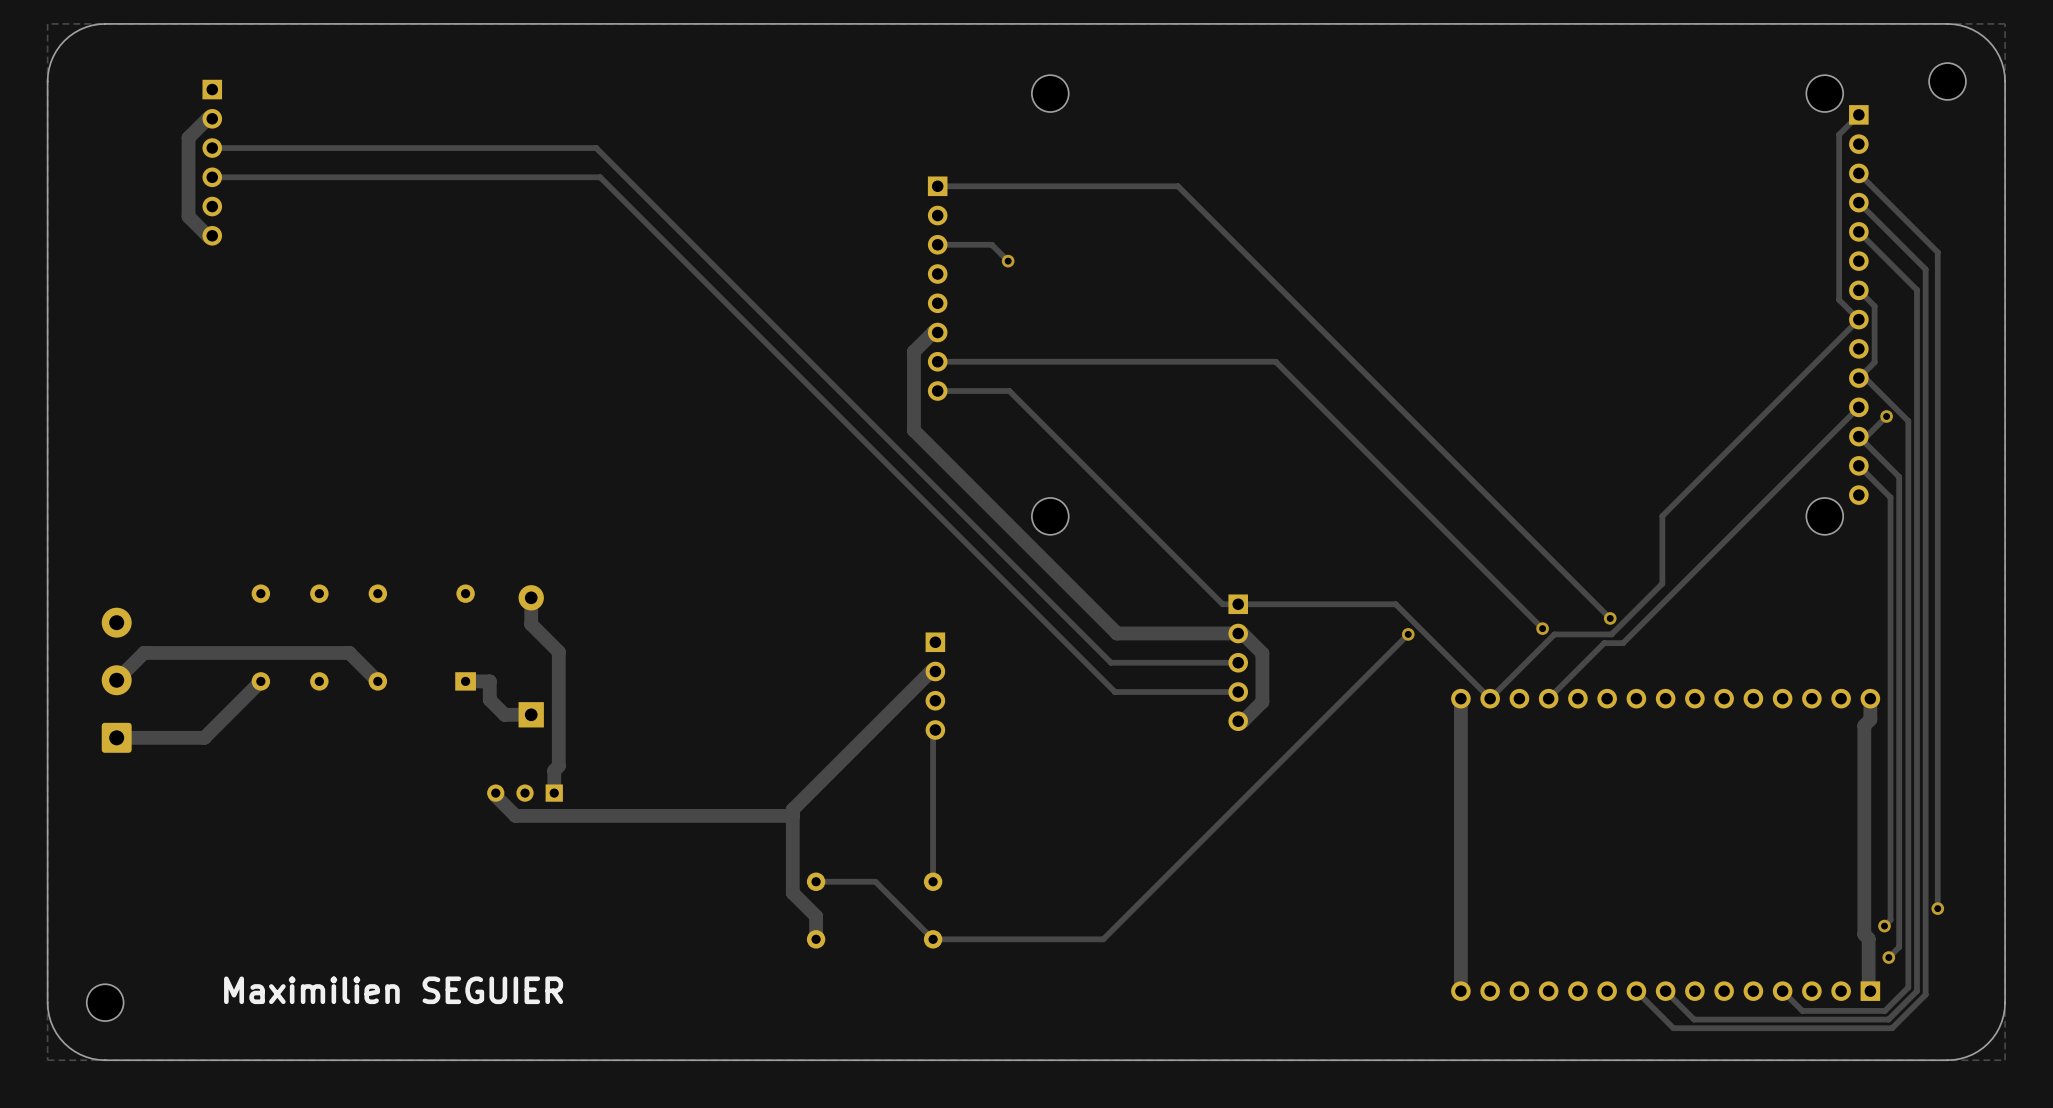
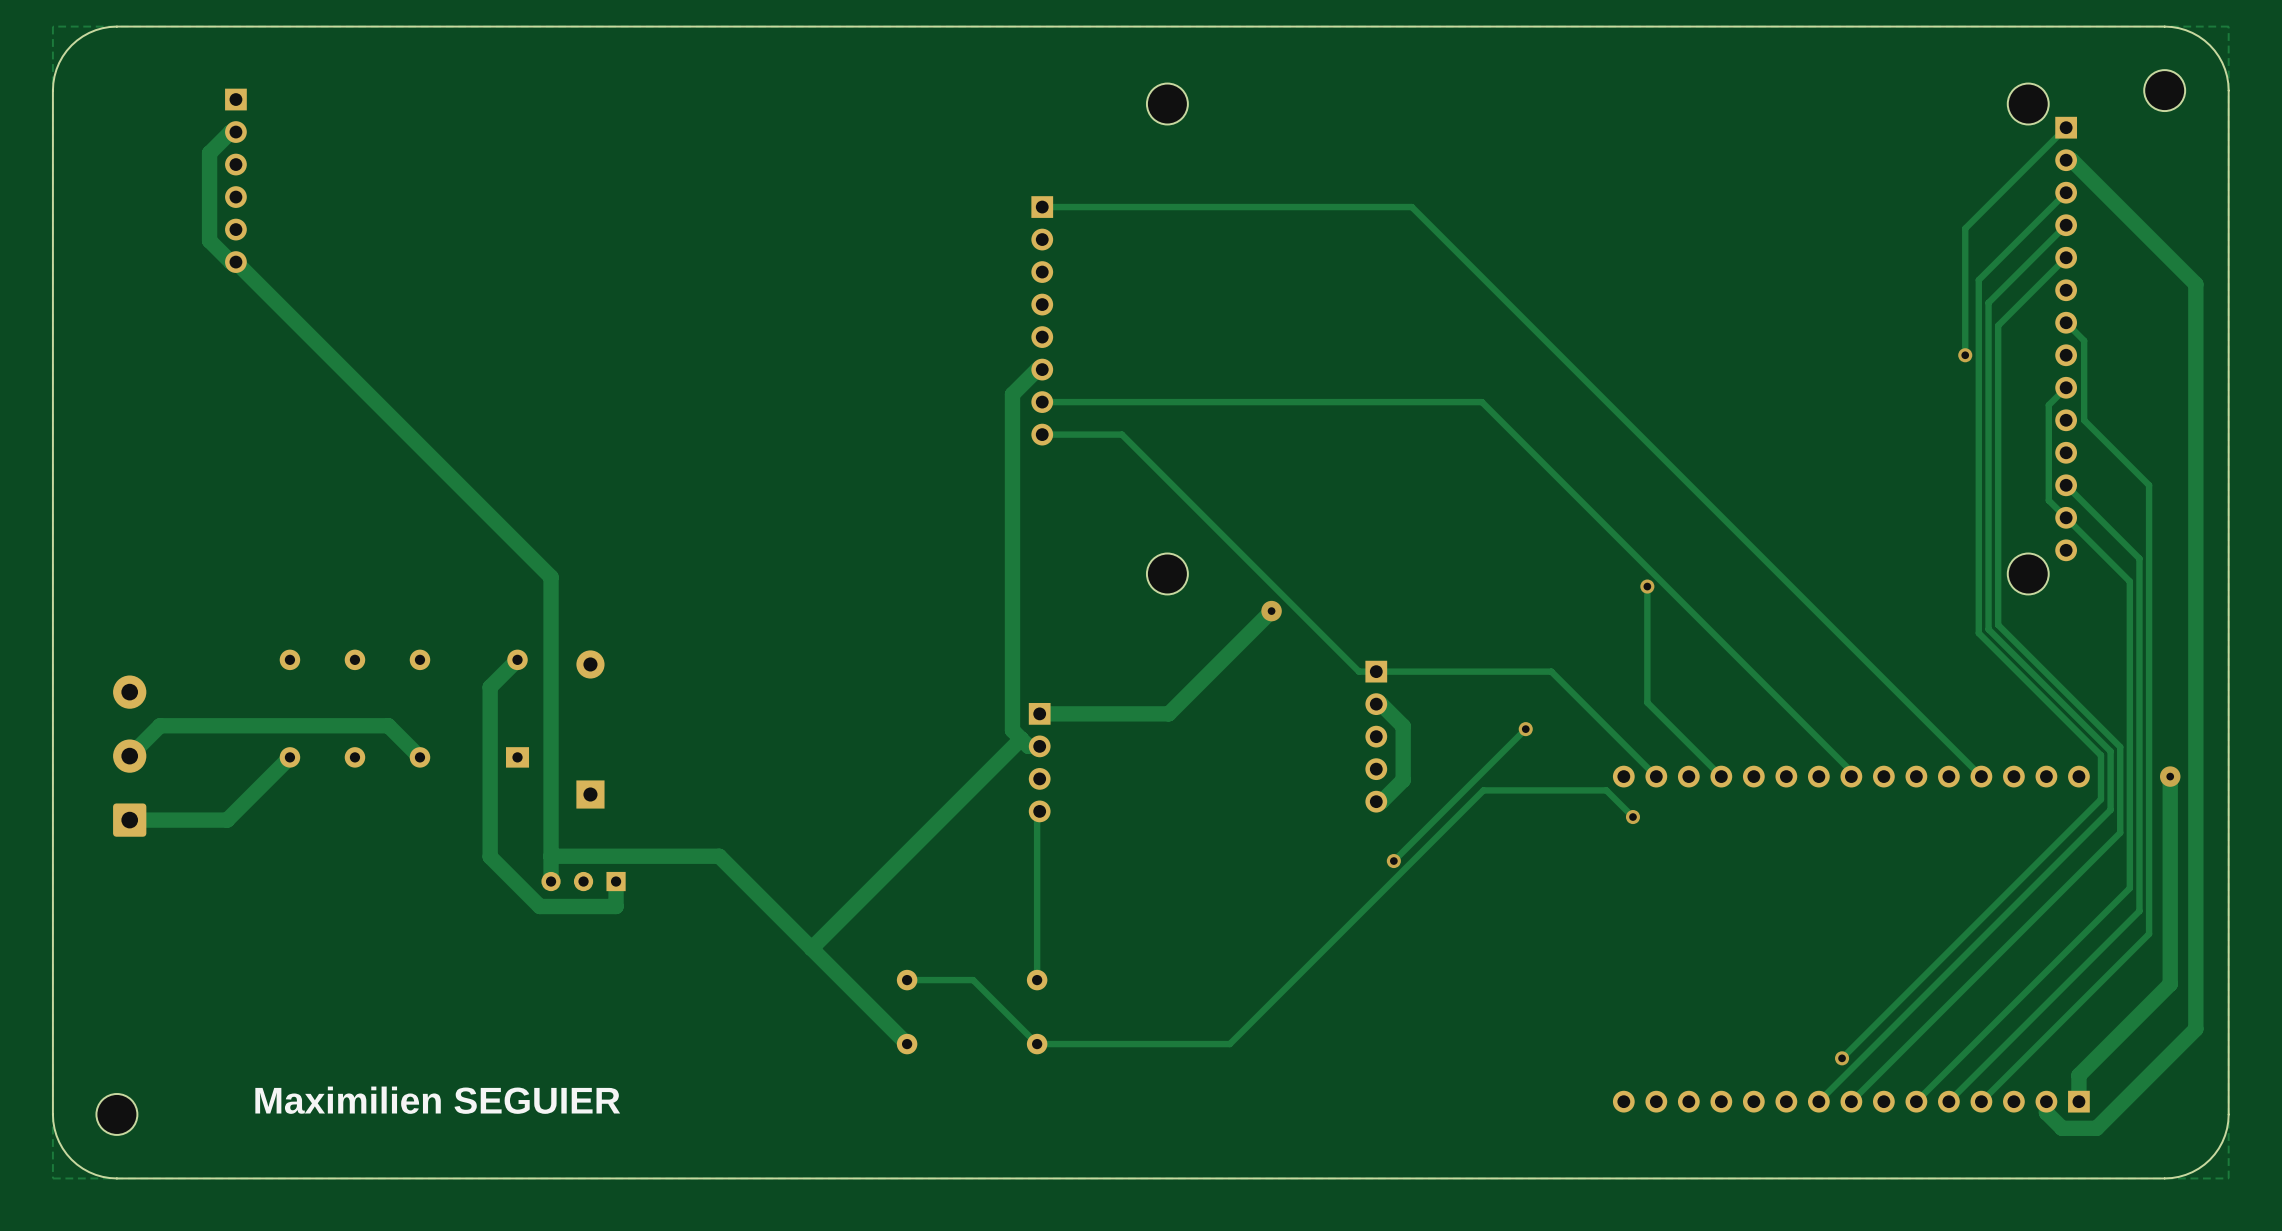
track: (1839, 134) (1839, 299) (1858, 319) (1662, 516) (1662, 583) (1611, 634) (1554, 634) (1490, 698) -> (2044, 149) (1965, 228) (1965, 355)
track: none -> (2066, 160) (2071, 160) (2195, 284) (2195, 1029) (2096, 1128) (2062, 1128) (2046, 1112) (2046, 1101)
track: (212, 148) (596, 148) (1110, 662) (1238, 662) -> none
track: (1858, 173) (1937, 252) (1937, 908) -> (2066, 192) (1978, 280) (1978, 633) (2100, 755) (2100, 799) (1842, 1058)
track: (212, 177) (600, 177) (1114, 691) (1238, 691) -> none
track: (1178, 186) (1610, 618) -> (1309, 207) (1411, 207) (1981, 776)
track: (1858, 202) (1925, 269) (1925, 994) (1892, 1028) (1673, 1028) (1636, 991) -> (2066, 225) (1988, 302) (1988, 629) (2110, 751) (2110, 809) (1818, 1101)
track: (1858, 231) (1917, 290) (1917, 991) (1888, 1019) (1694, 1019) (1665, 991) -> (2066, 257) (1998, 325) (1998, 624) (2120, 747) (2120, 832) (1851, 1101)
track: (937, 244) (991, 244) (1008, 261) -> none
via: (1008, 261) -> none
track: (1874, 306) (1874, 362) (1858, 378) -> none
via: none -> (1965, 355)
track: (933, 332) (913, 351) (913, 430) (1117, 633) (1238, 633) -> (1037, 369) (1012, 394) (1012, 730) (1028, 746) (1034, 746)
track: none -> (2066, 387) (2048, 405) (2048, 500) (2066, 517)
track: (1275, 361) (1542, 628) -> (1417, 402) (1481, 402) (1851, 771) (1851, 776)
track: (1865, 378) (1908, 421) (1908, 987) (1884, 1010) (1802, 1010) (1782, 991) -> (2083, 340) (2084, 420) (2149, 485) (2149, 933) (1981, 1101)
track: (1858, 407) (1623, 643) (1604, 643) (1548, 698) -> (1647, 586) (1647, 702) (1721, 776)
track: (1886, 416) (1862, 440) -> none
via: (1886, 416) -> none
track: (1899, 476) (1899, 947) (1888, 957) -> (2110, 530) (2139, 558) (2139, 911) (1948, 1101)
track: (1890, 497) (1890, 920) (1884, 926) -> (2101, 553) (2129, 581) (2129, 888) (1916, 1101)
via: none -> (1647, 586)
track: none -> (1271, 611) (1168, 713) (1039, 713)
via: none -> (1271, 611)
track: (531, 597) (531, 624) (558, 651) (558, 766) (554, 770) (554, 793) -> (517, 659) (490, 687) (490, 856) (539, 906) (616, 906) (616, 881)
via: (1610, 618) -> none
via: (1542, 628) -> none
track: (1408, 634) (1103, 939) -> (1632, 817) (1606, 790) (1483, 790) (1229, 1044) (1226, 1044)
via position: (1408, 634) -> (1525, 729)
track: none -> (1525, 729) (1393, 861)
track: none -> (1021, 738) (811, 948)
track: (930, 671) (792, 809) (792, 892) (816, 916) (816, 939) -> (551, 856) (719, 856) (907, 1044)
track: (465, 681) (489, 681) (489, 699) (504, 714) (531, 714) -> none
track: (1460, 698) (1460, 991) -> none
track: (1870, 698) (1870, 719) (1864, 725) (1864, 934) (1868, 938) (1868, 989) (1870, 991) -> (2170, 776) (2170, 984) (2078, 1075) (2078, 1101)
via: none -> (2170, 776)
via: none -> (1632, 817)
via: none -> (1393, 861)
track: (495, 793) (495, 796) (515, 815) (792, 815) -> (551, 881) (551, 577) (235, 262)
via: (1937, 908) -> none
via: (1884, 926) -> none
via: none -> (1842, 1058)
via: (1888, 957) -> none

